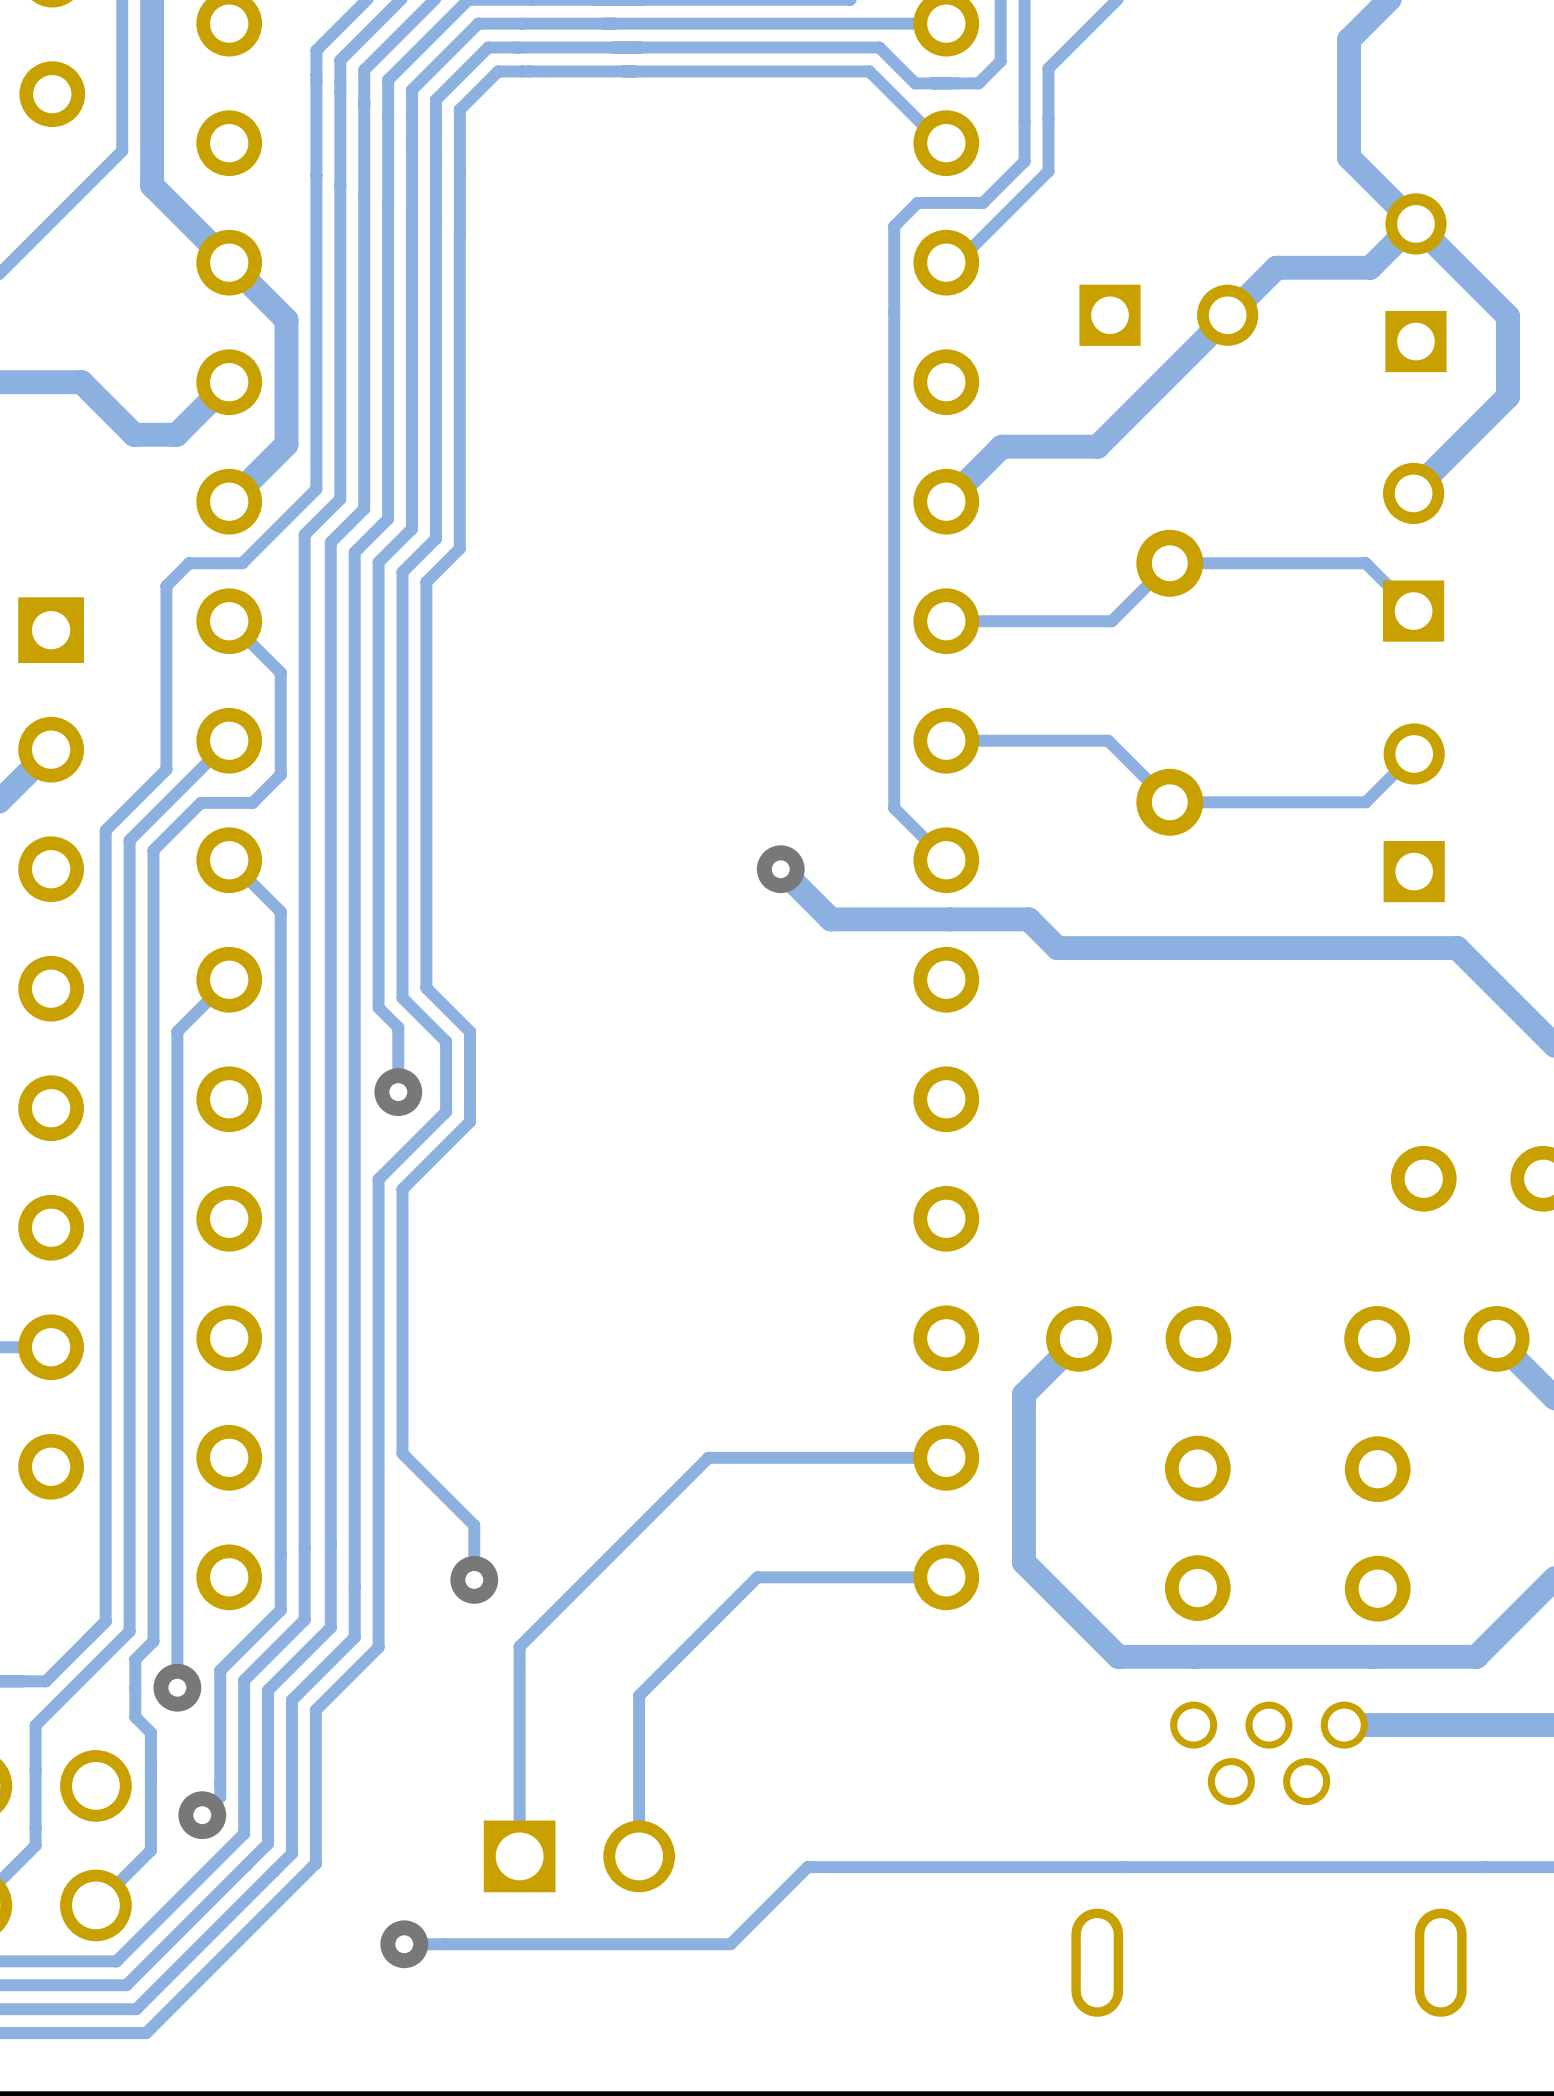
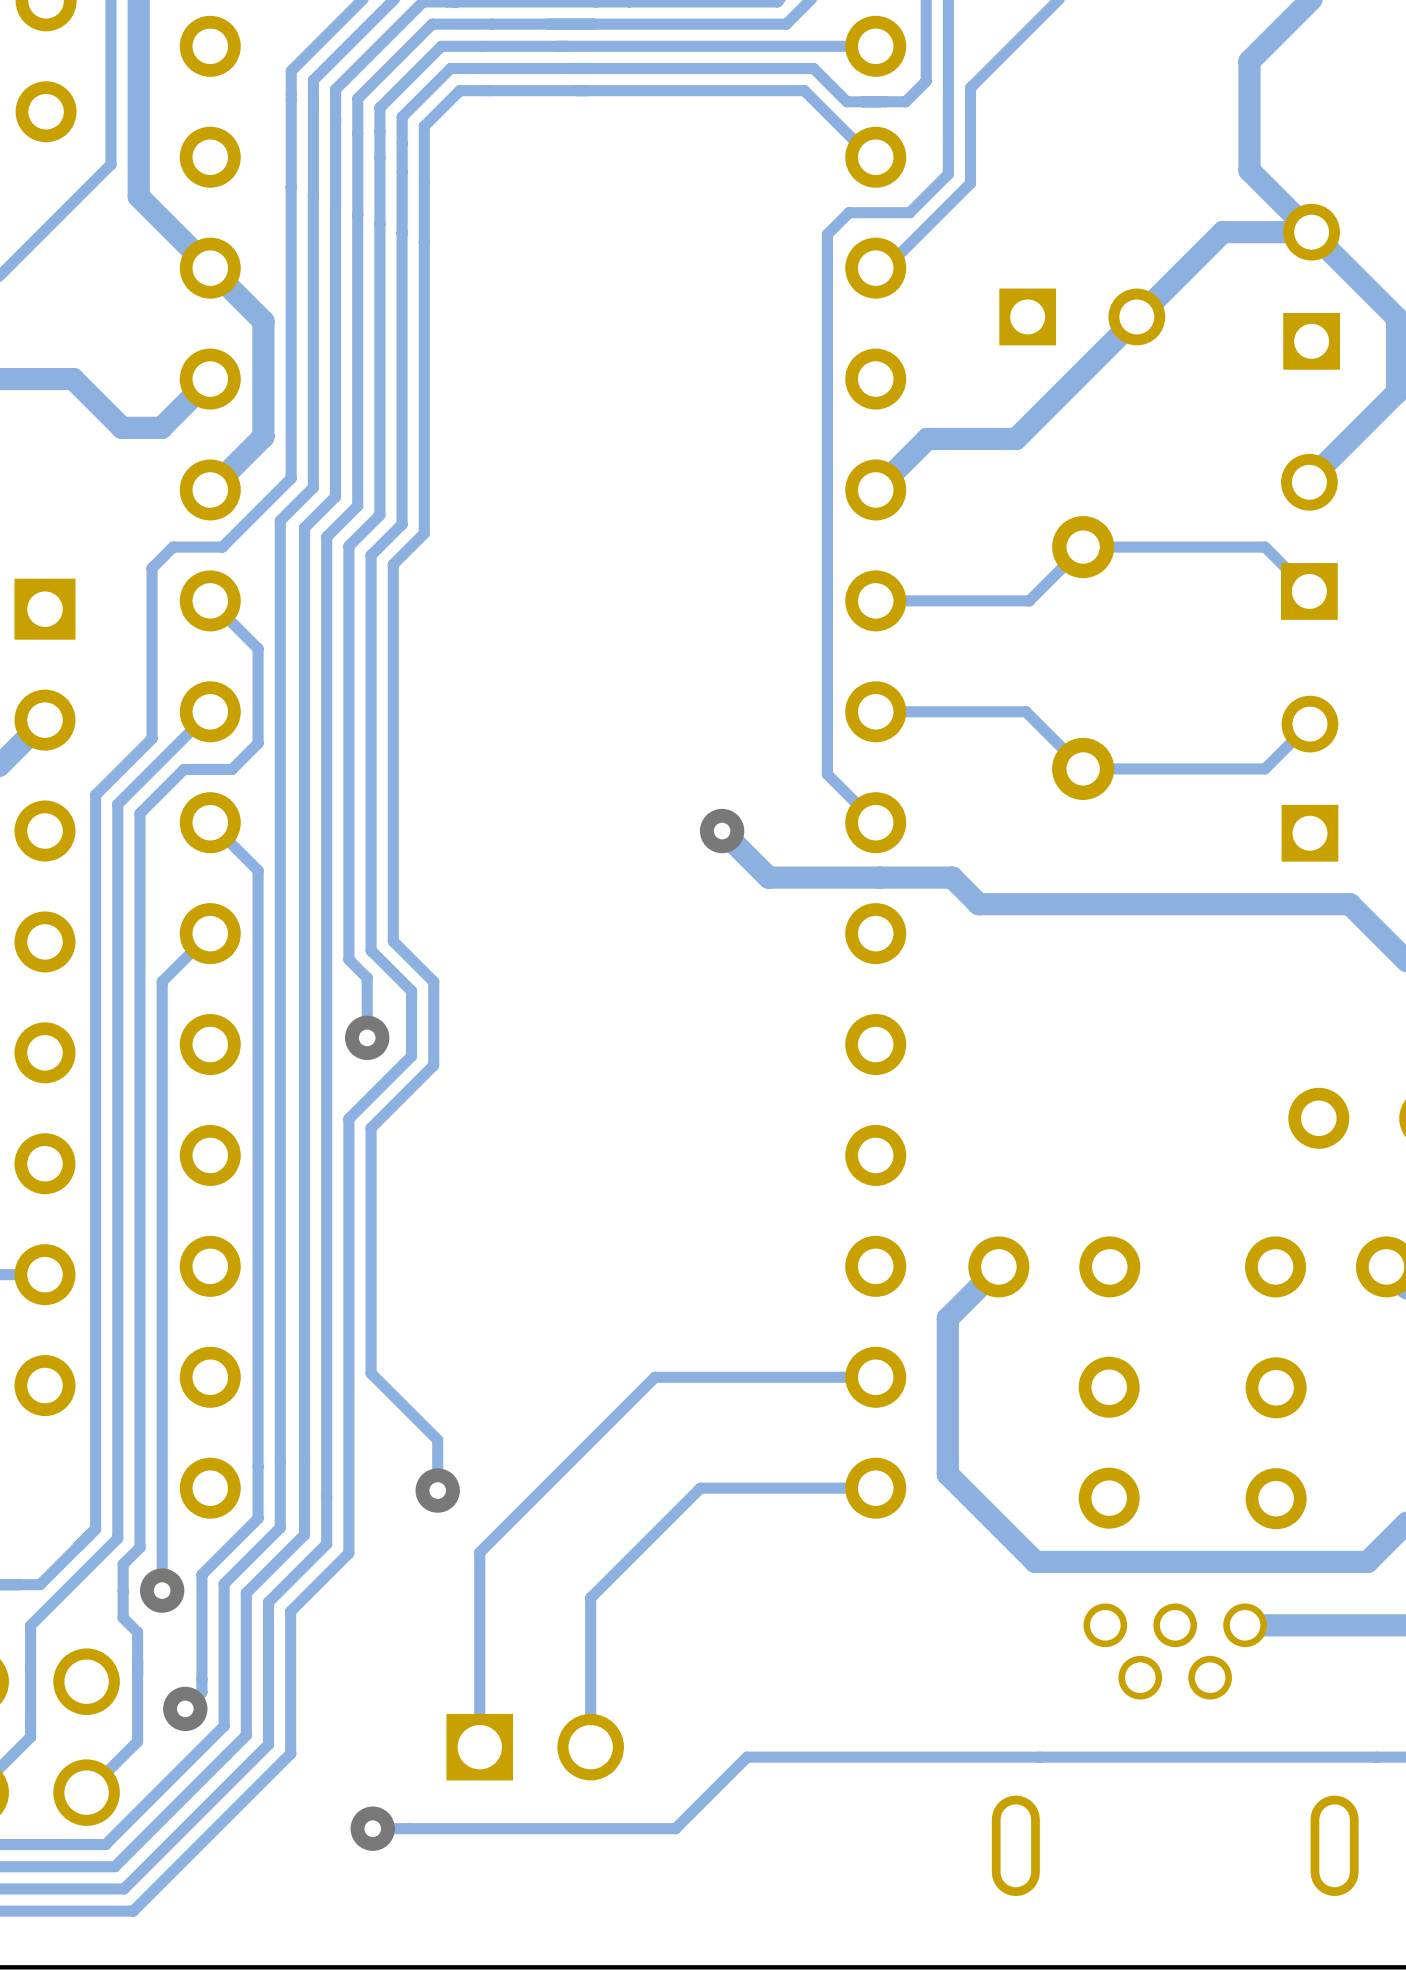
track: (1414, 223) (1370, 267) (1276, 267) -> (1309, 232) (1222, 232) (1182, 272)

